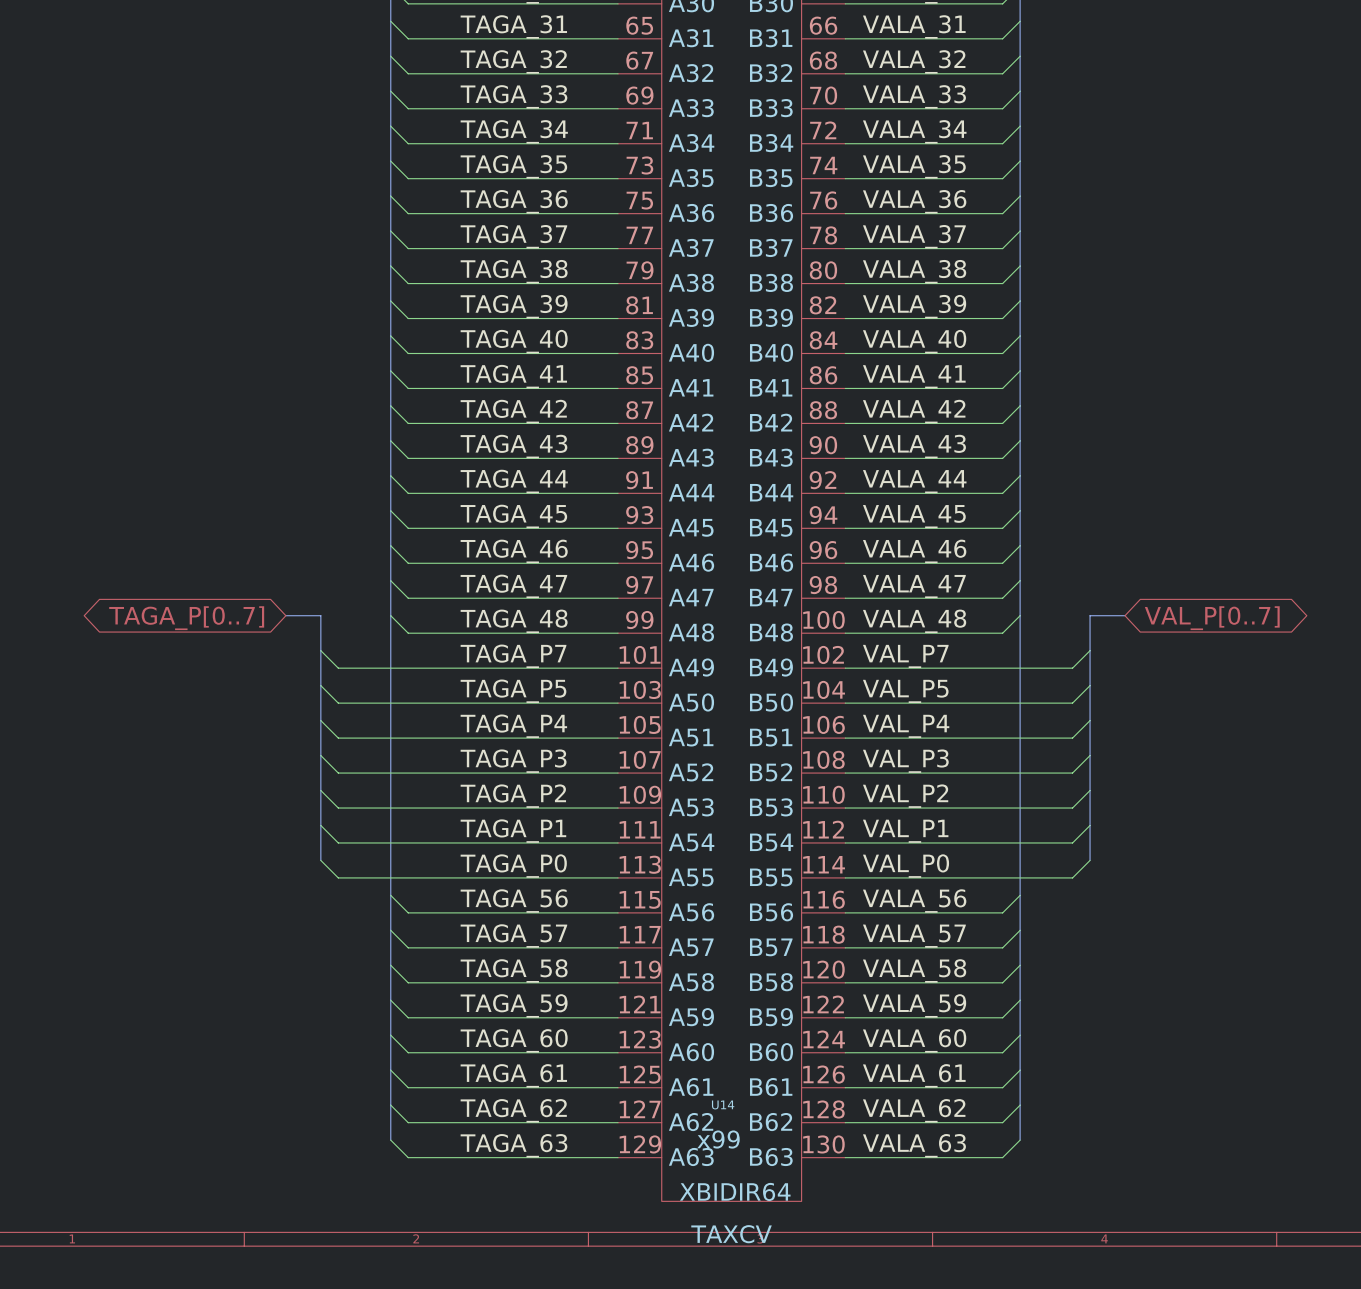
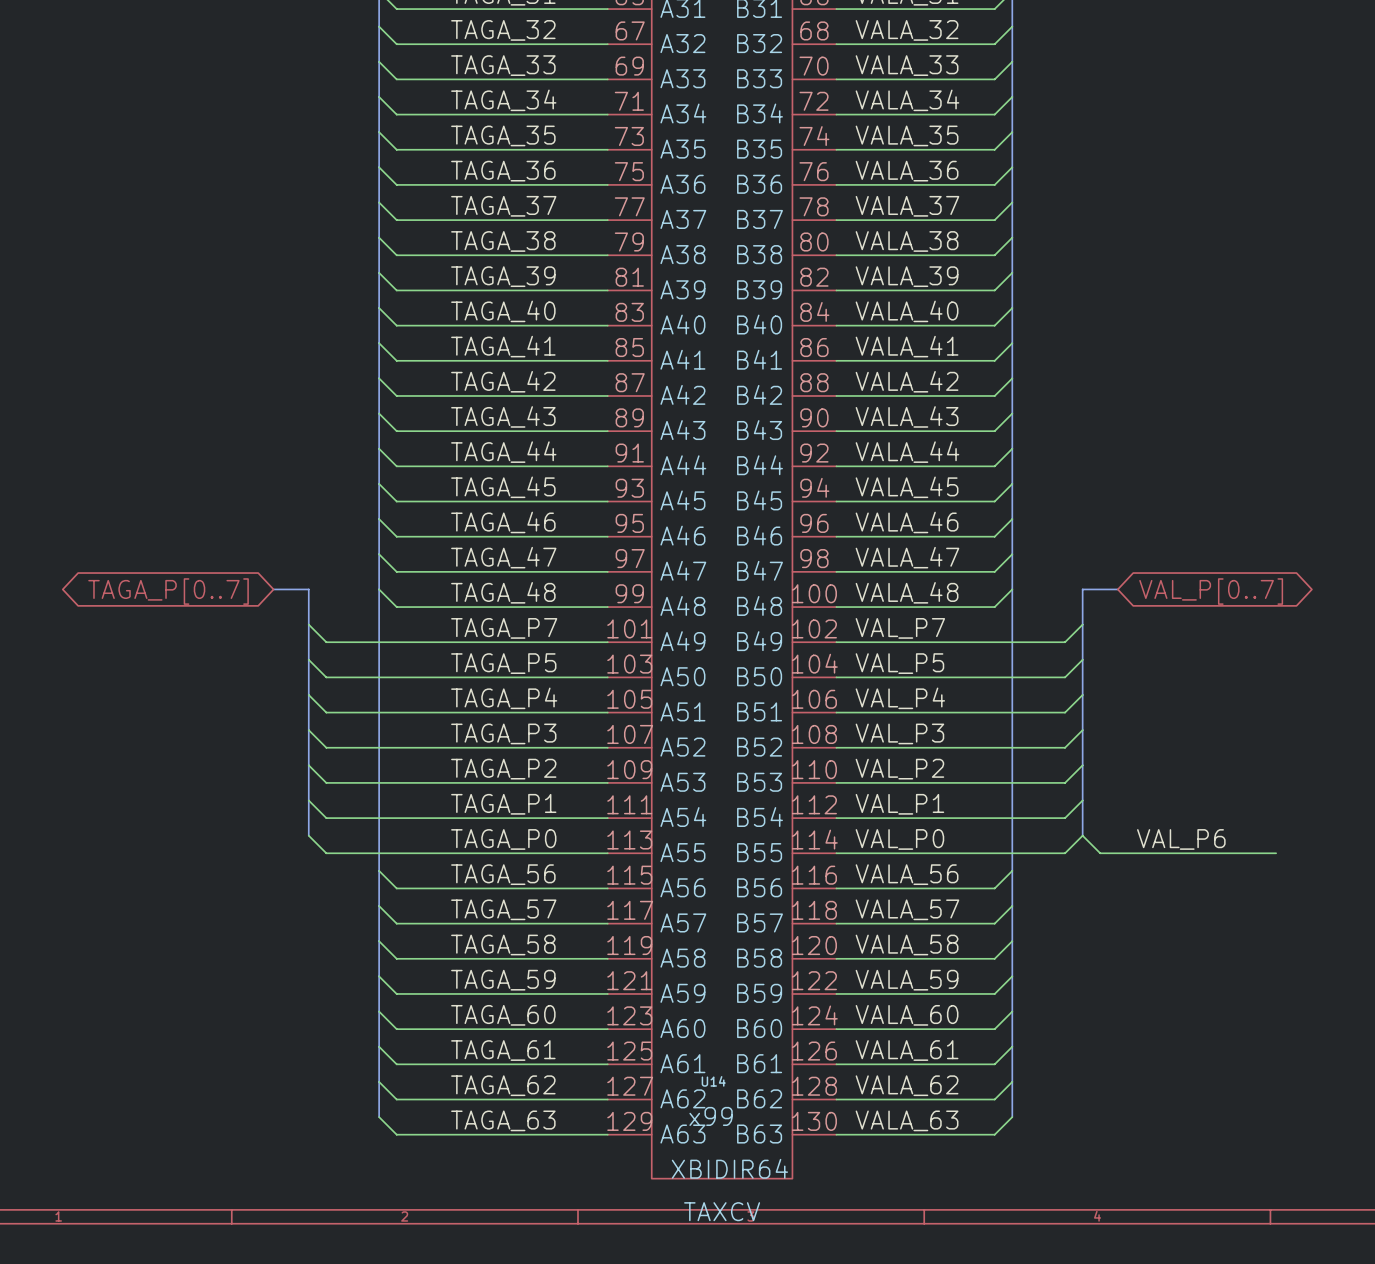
wire: none -> (1082, 835) (1100, 853) (1276, 853)
label: none -> VAL_P6 (1181, 839)

